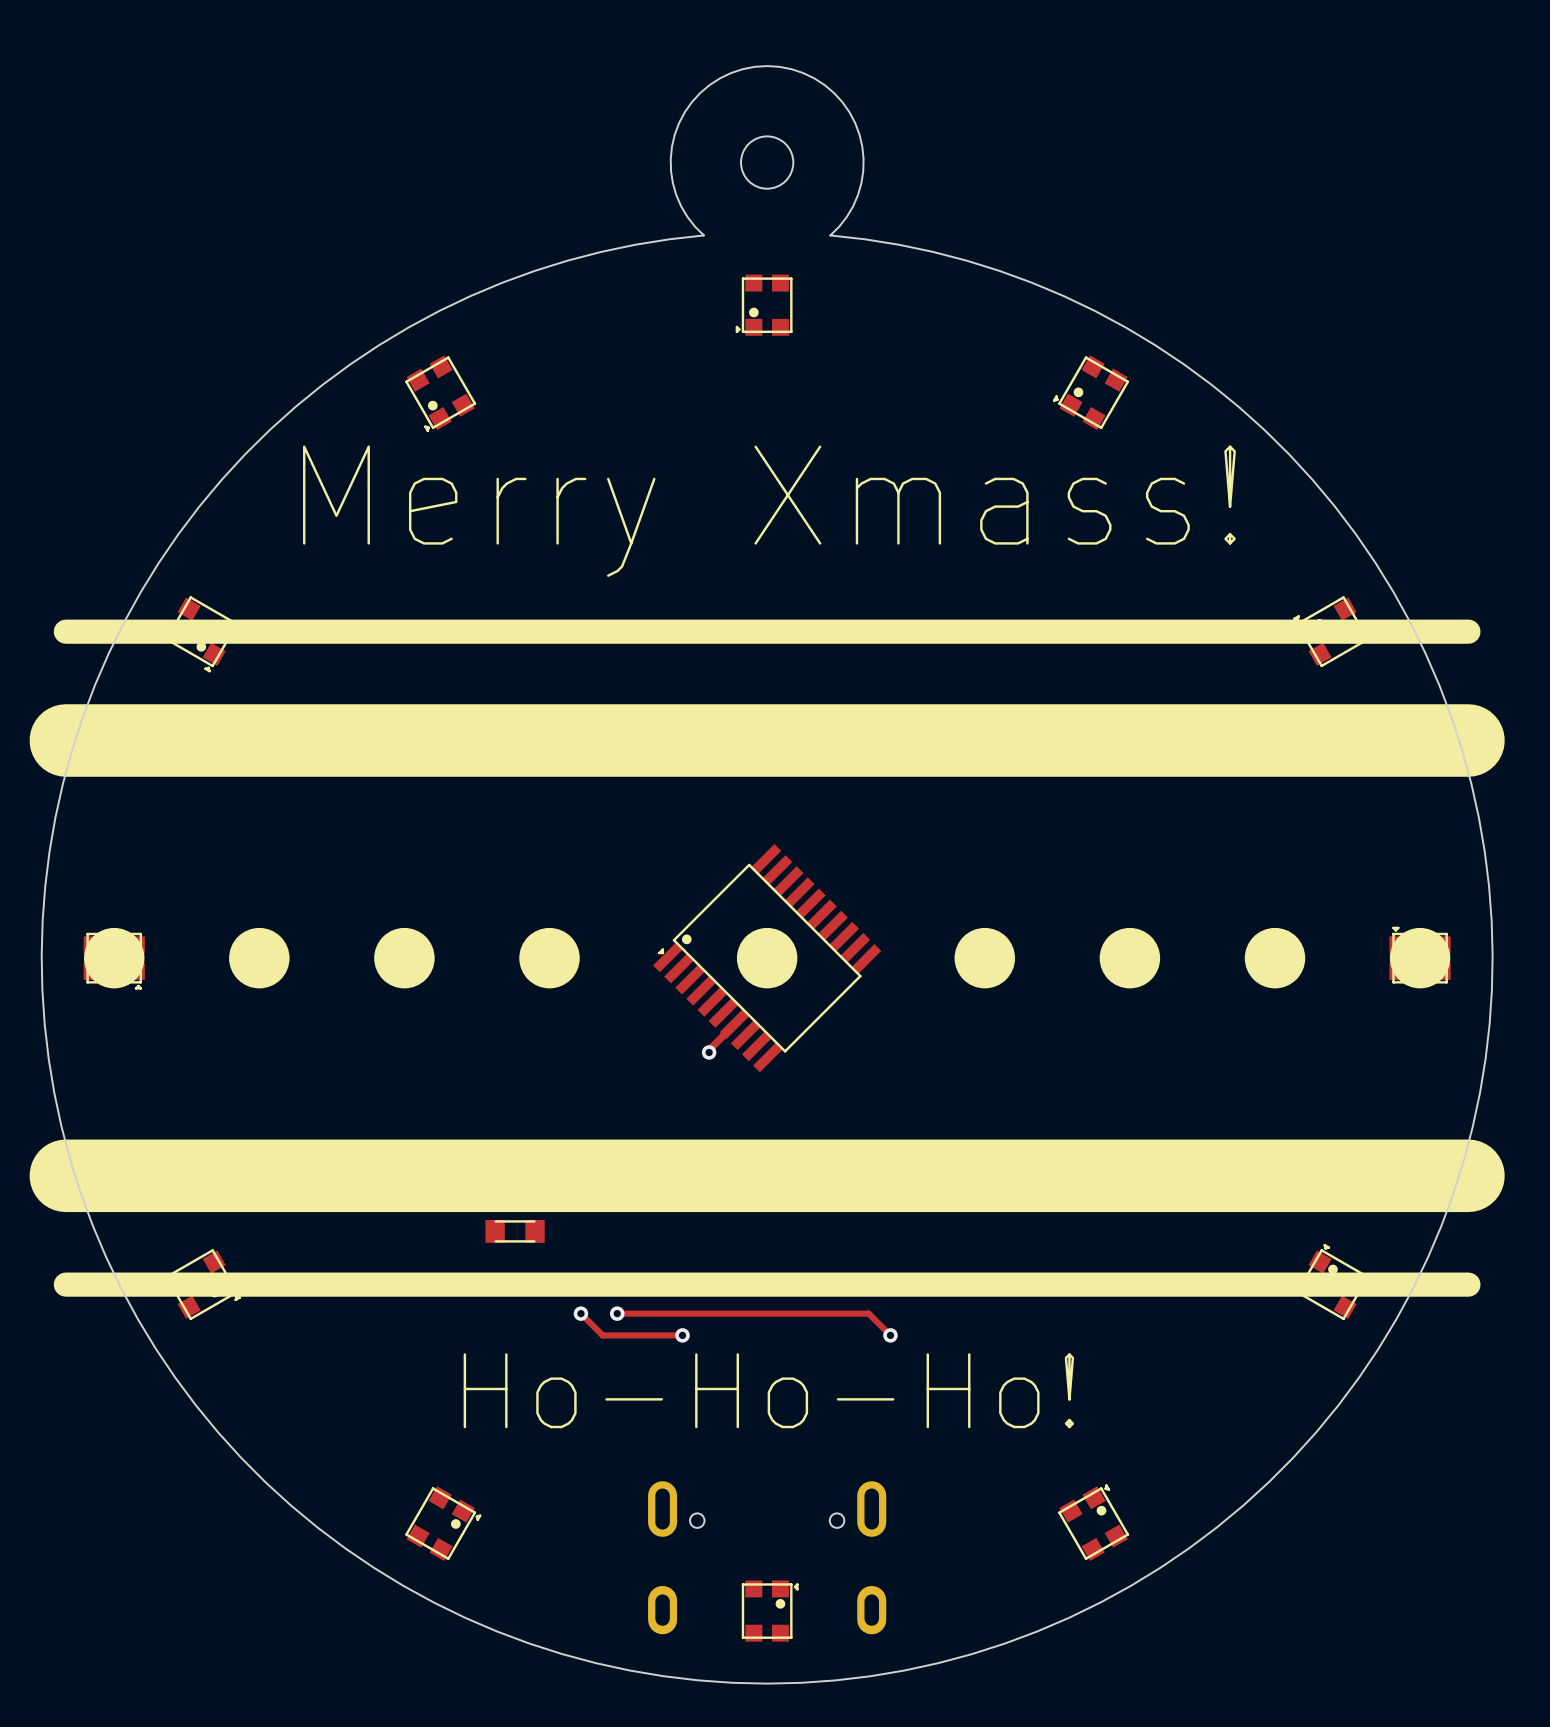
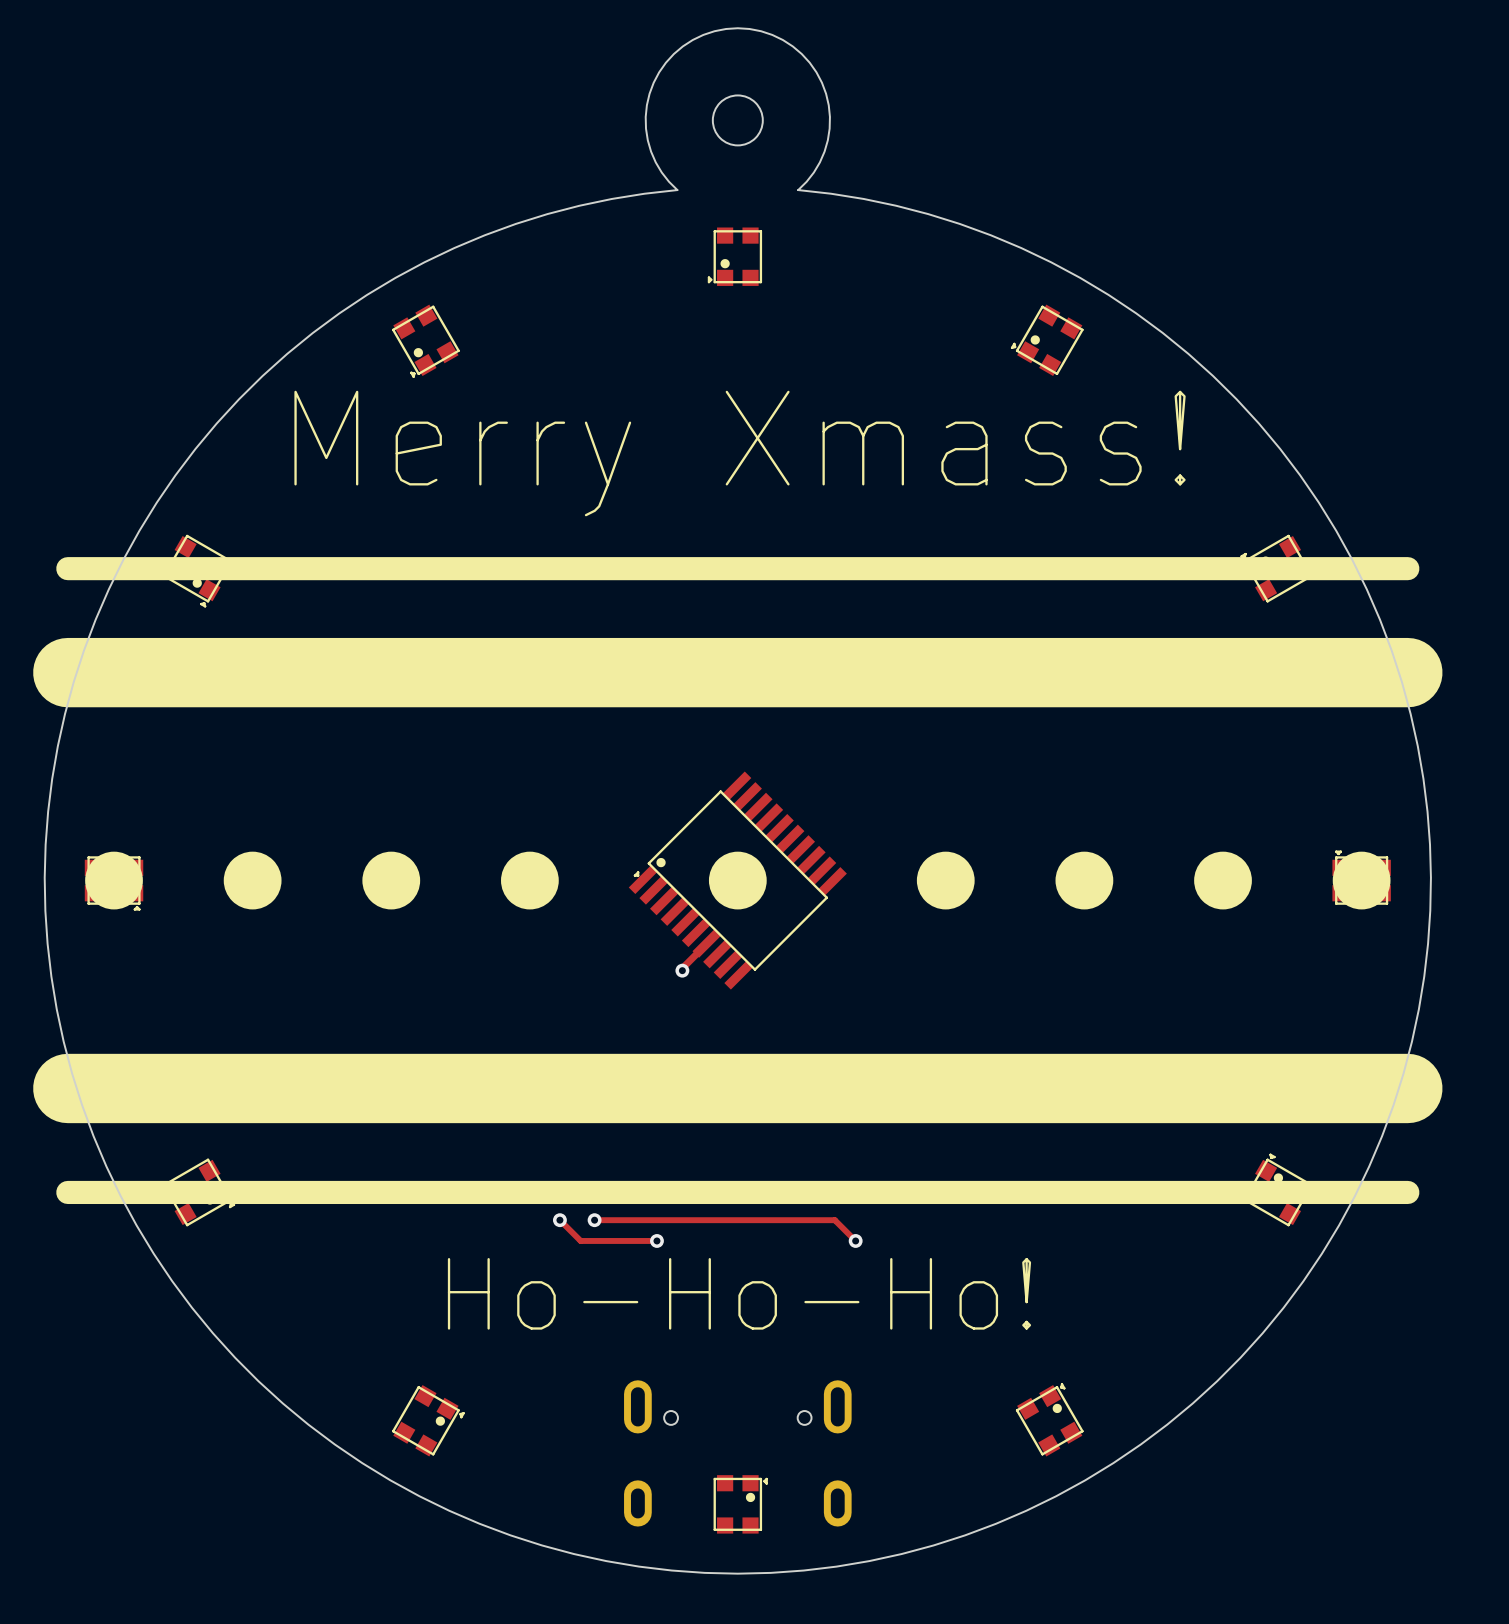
part: (515, 1231) -> none

